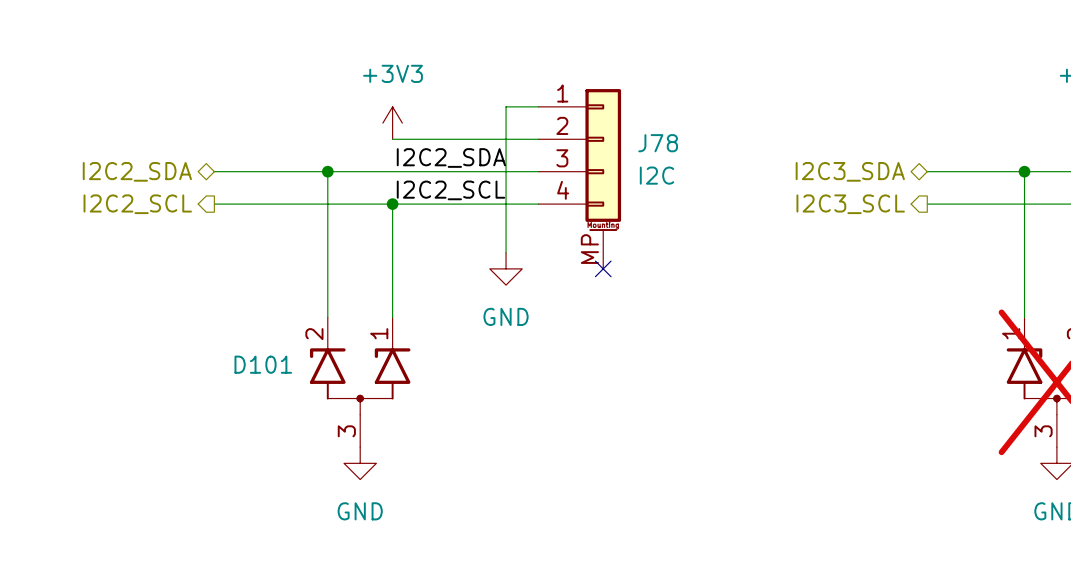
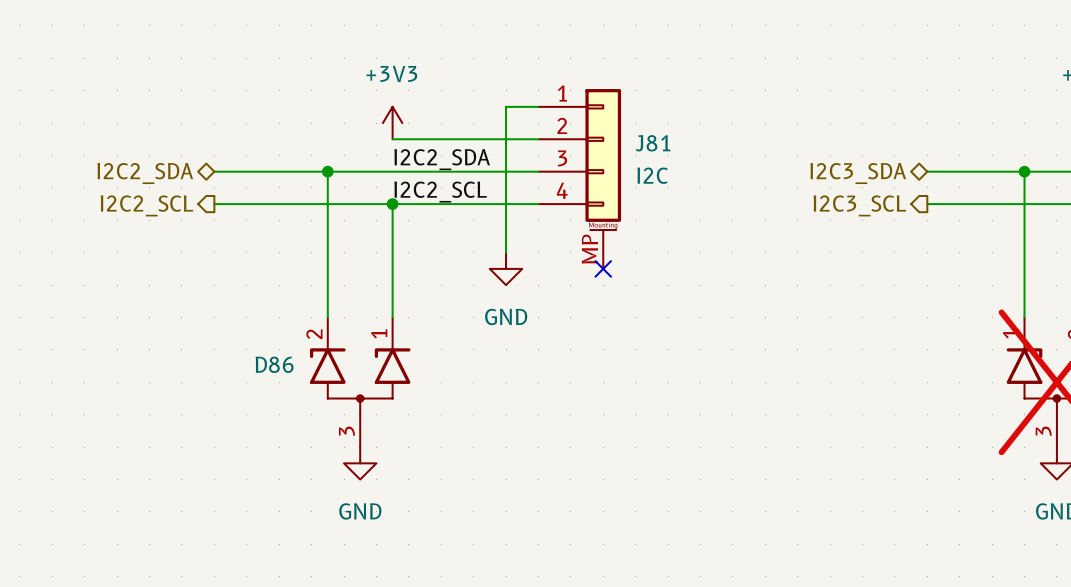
J78 name: J78 (658, 143) -> J81 (652, 143)
D101 name: D101 (263, 364) -> D86 (274, 364)

